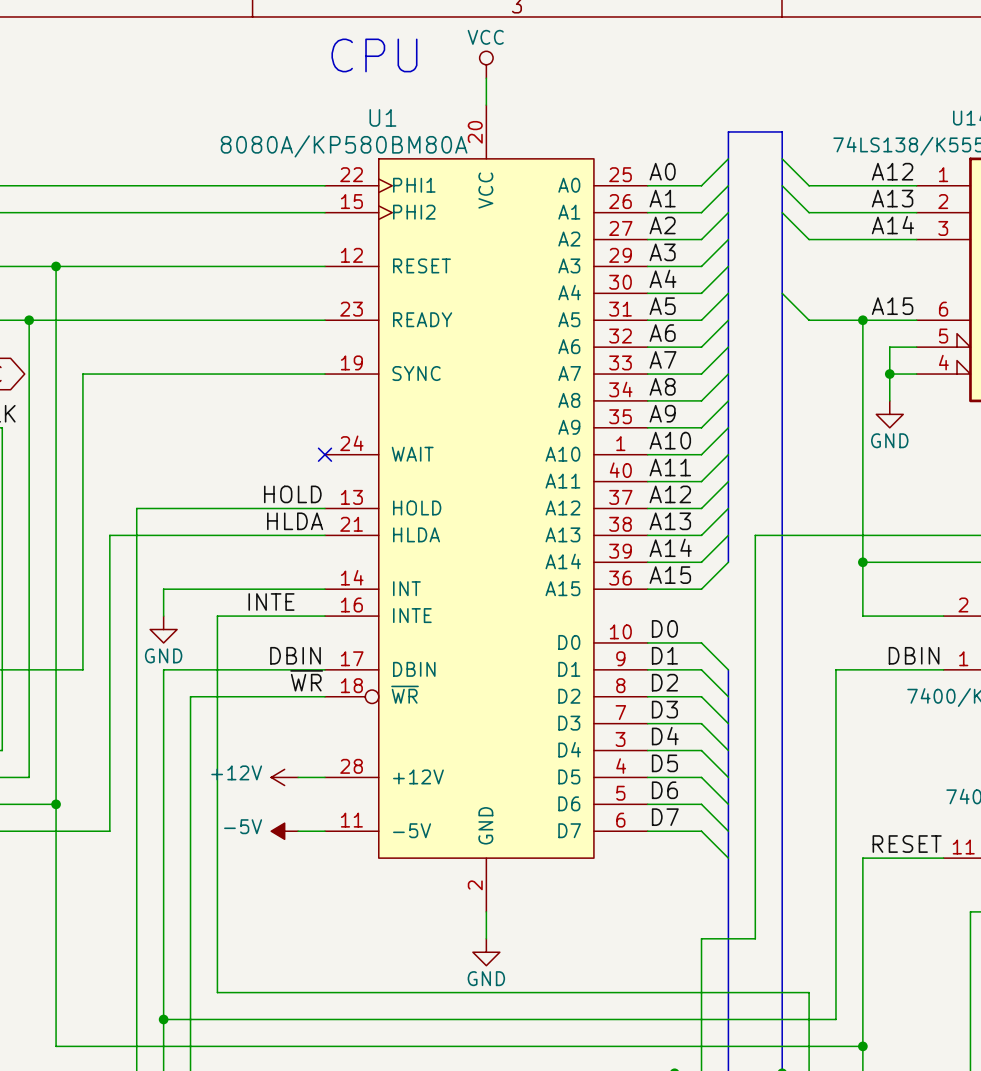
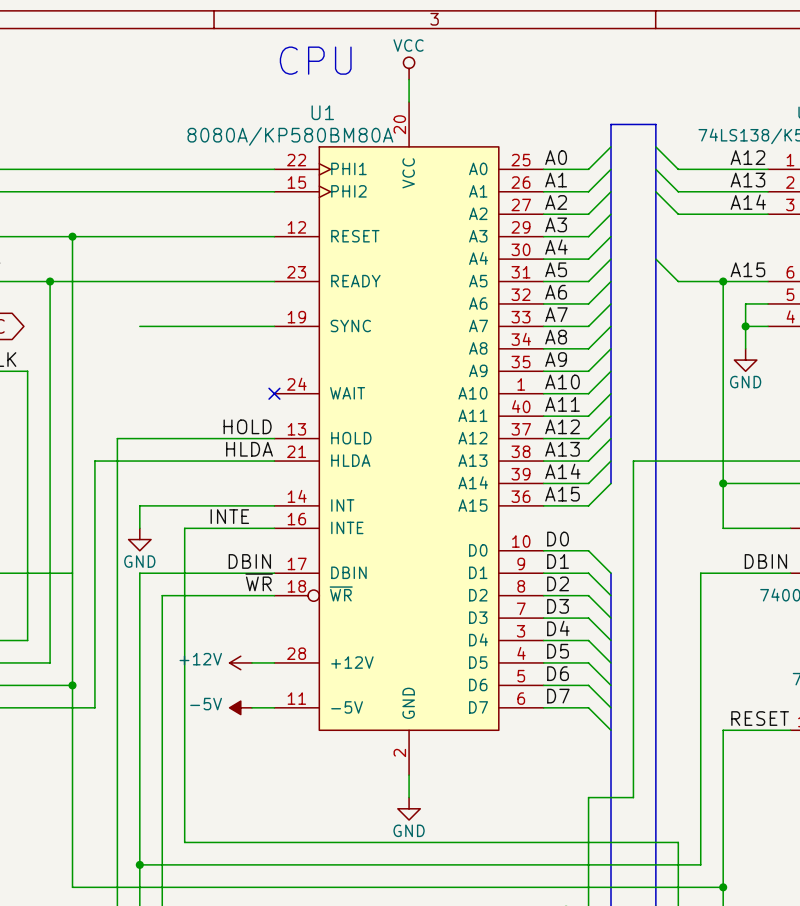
wire: (56, 266) (56, 320) -> none
junction: (56, 266) -> none
junction: none -> (72, 236)
wire: (29, 320) (29, 427) -> (5, 371) (27, 371)
junction: (29, 320) -> none
junction: none -> (50, 281)
wire: (82, 374) (163, 374) -> (72, 326) (72, 236)
wire: (2, 427) (2, 750) -> (27, 640) (5, 640)
wire: (29, 750) (29, 777) -> (50, 662) (27, 662)
wire: (56, 777) (56, 1046) (82, 1046) -> (72, 573) (72, 887)
wire: none -> (50, 685) (72, 685)
junction position: (56, 804) -> (72, 685)

